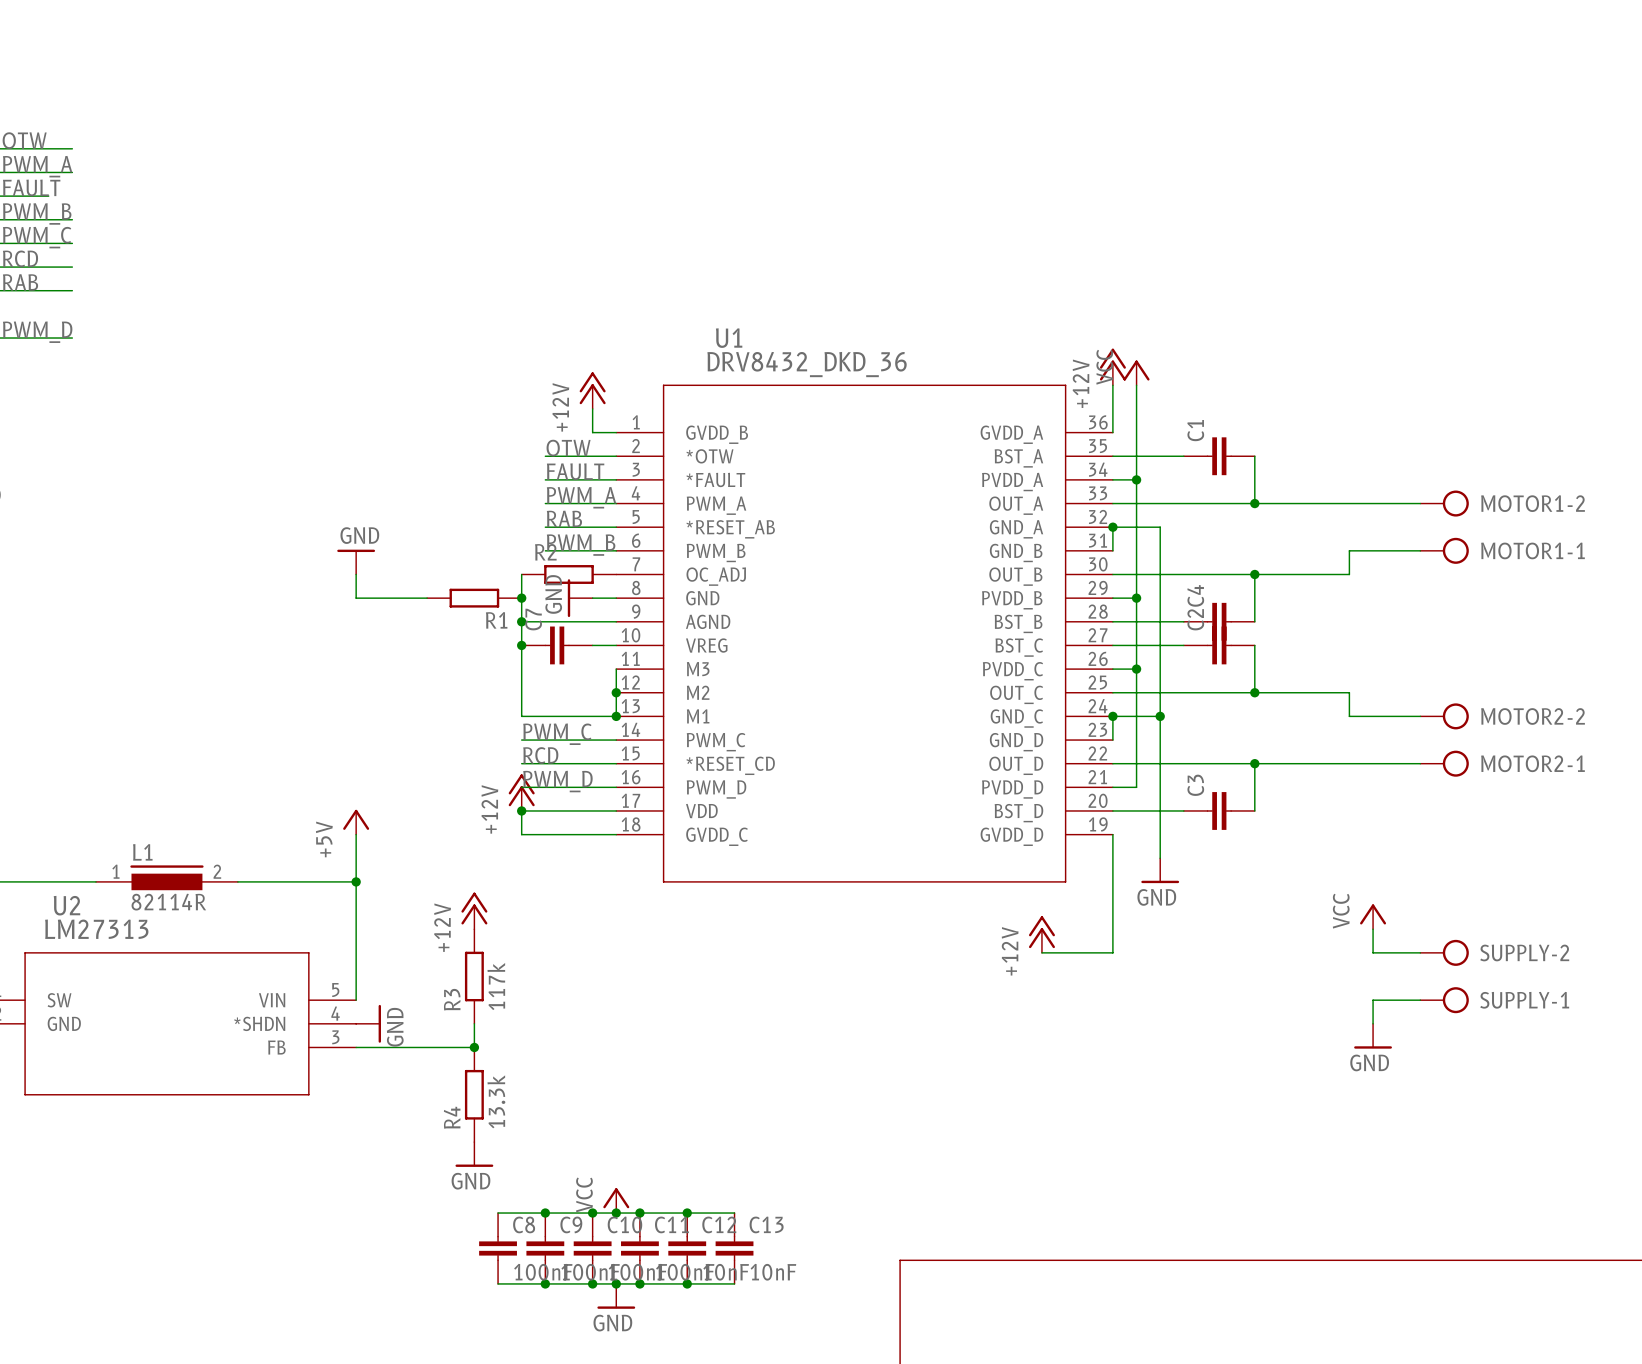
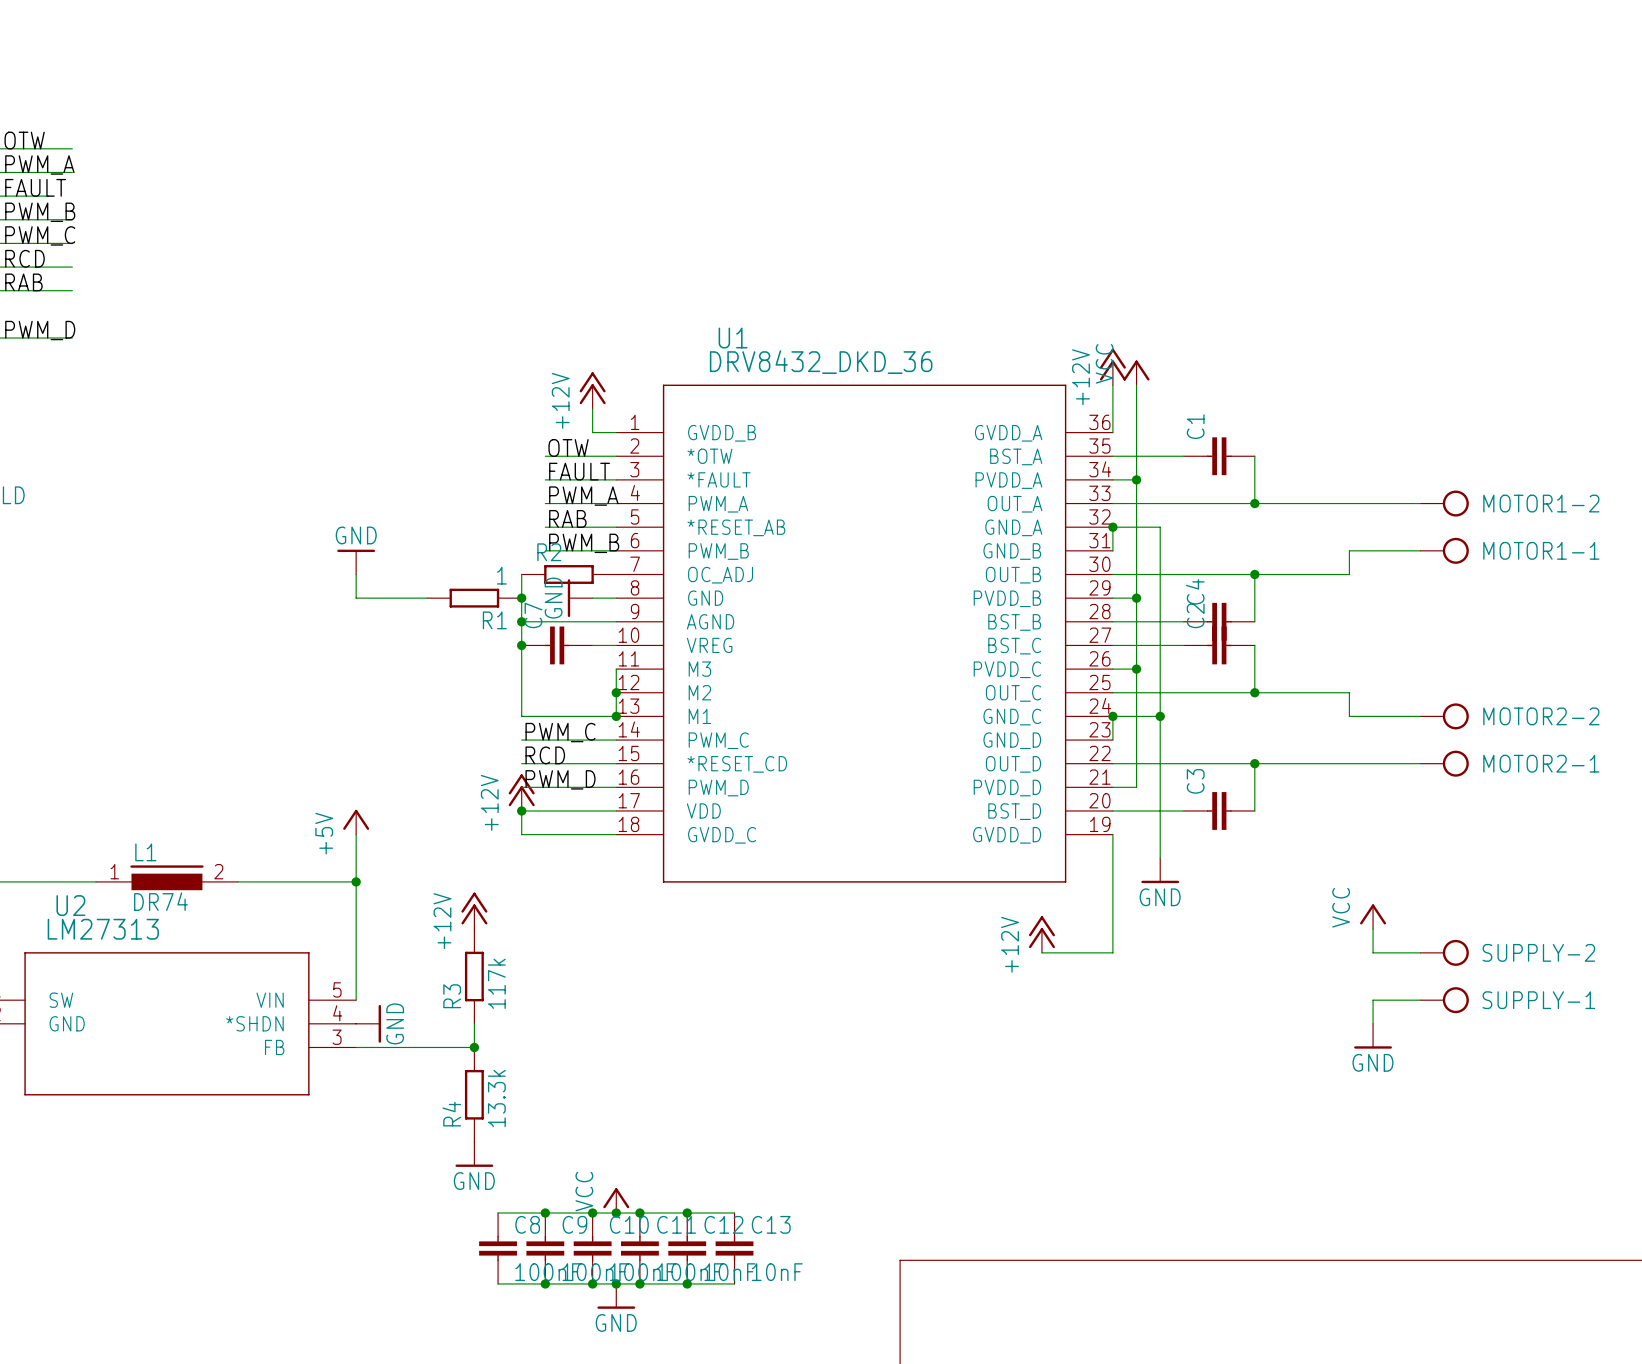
R1 value: none -> 1 (501, 575)
L1 value: 82114R (168, 902) -> DR74 (160, 901)

